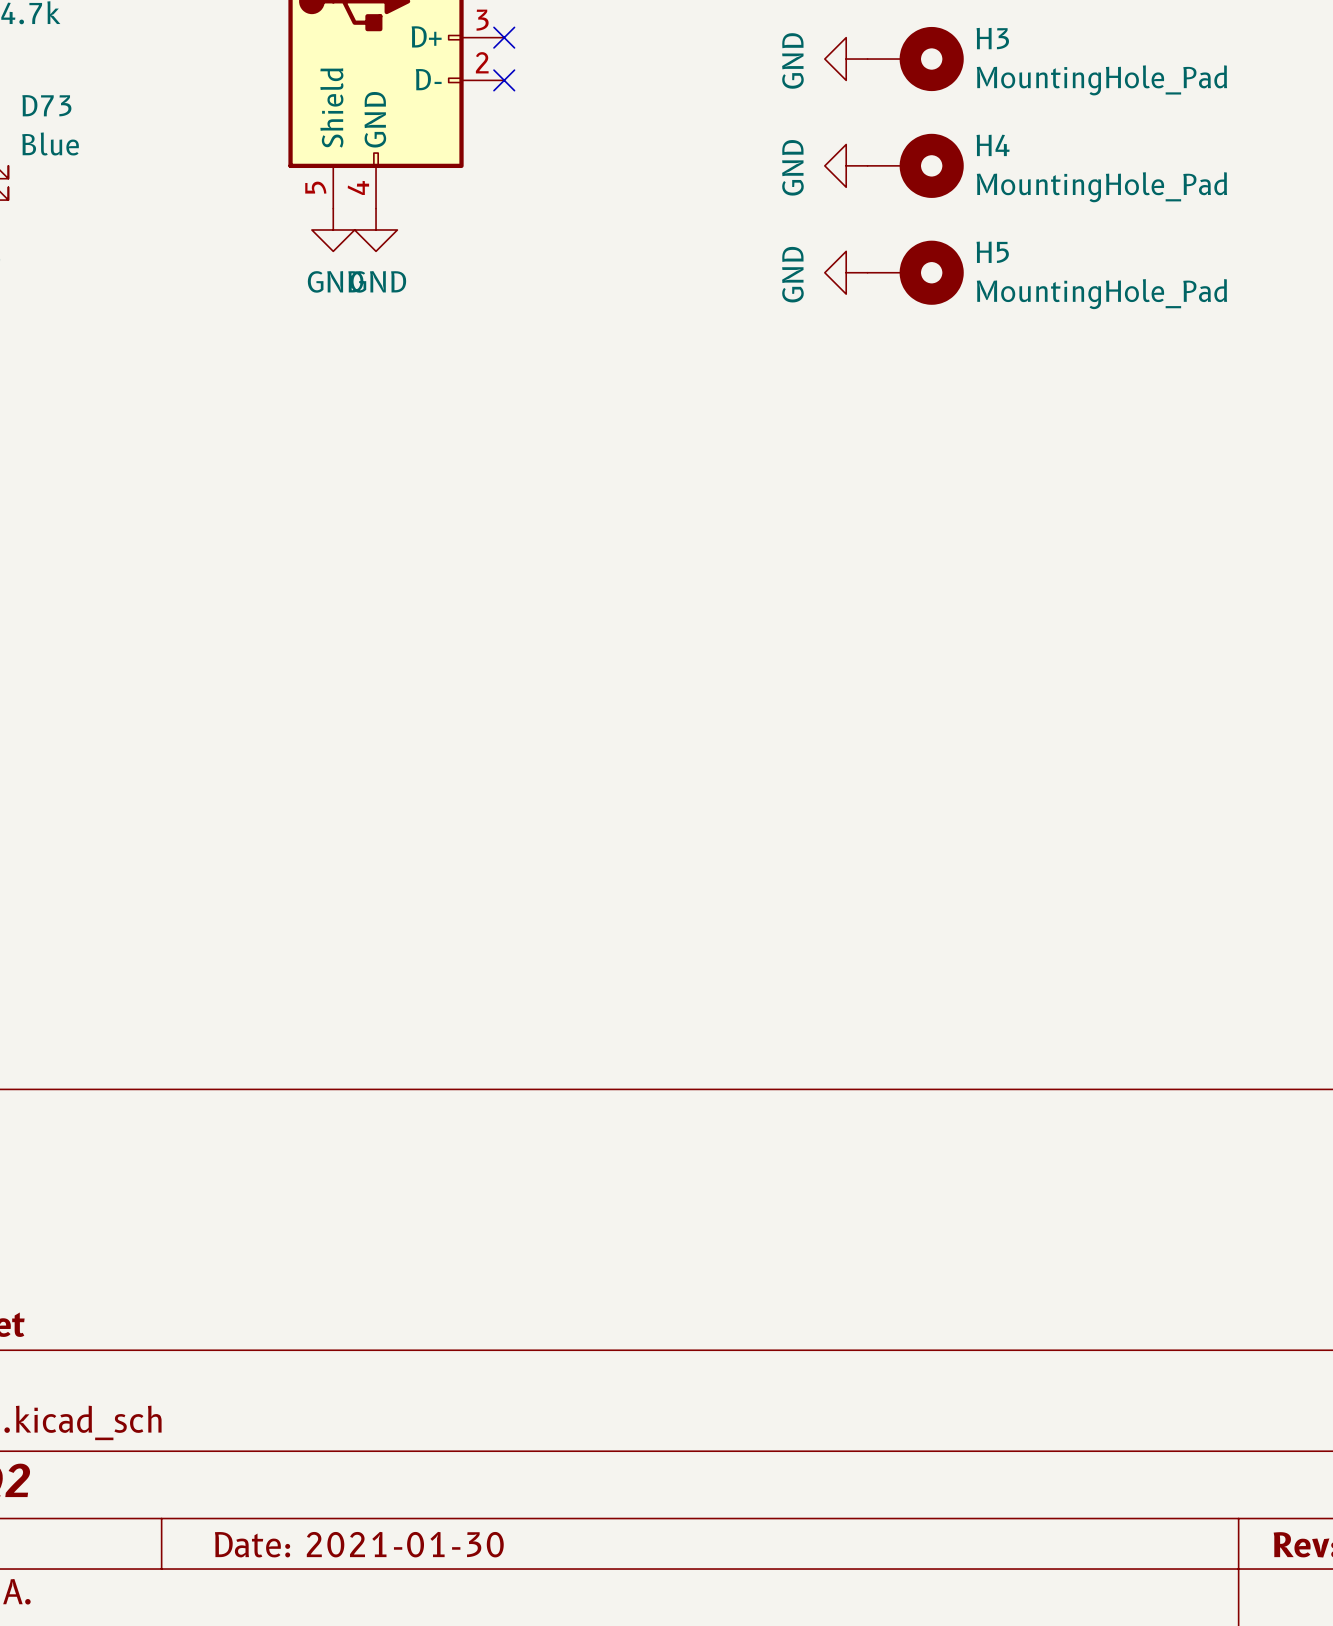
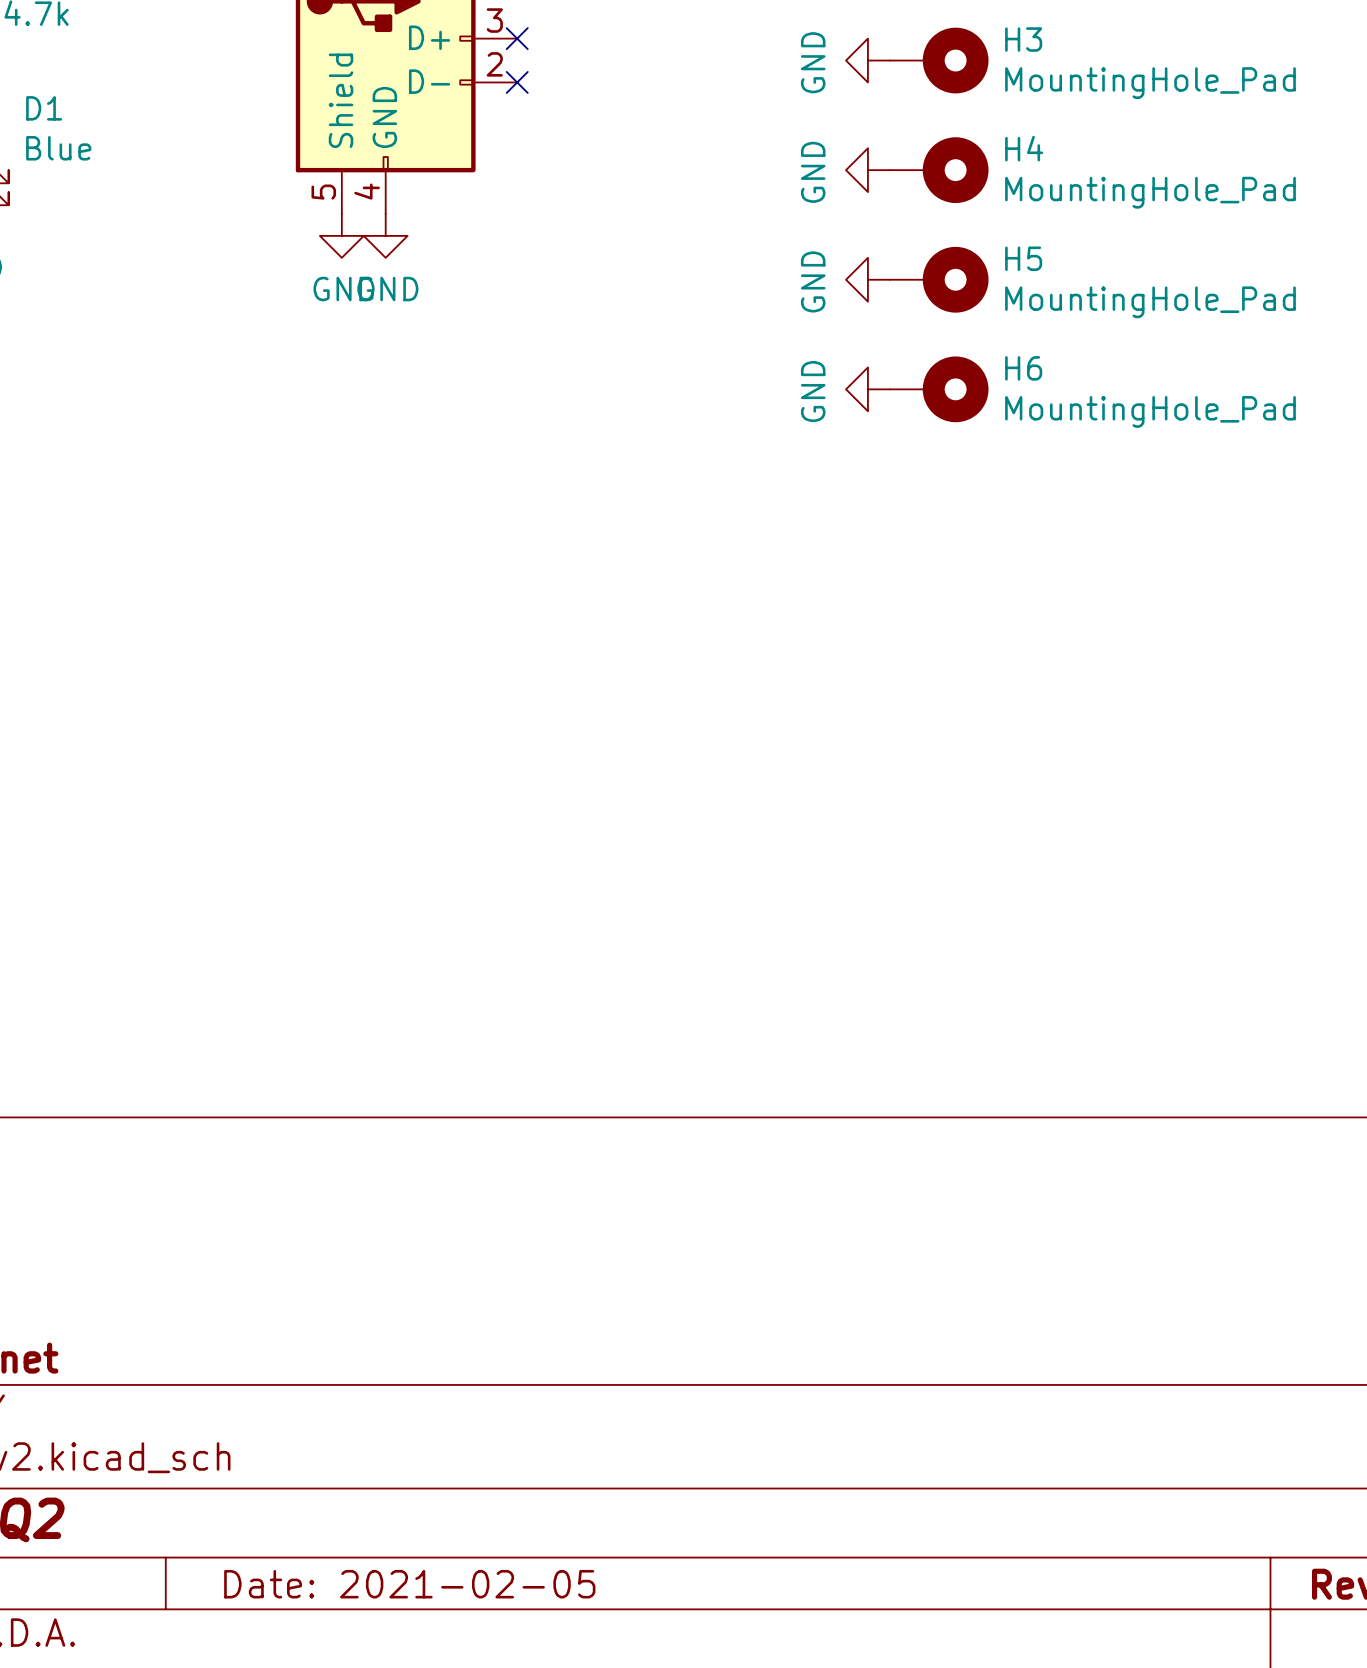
D73 name: D73 (46, 105) -> D1 (44, 108)
power symbol: none -> GND (867, 389)
H6: none -> MountingHole_Pad (939, 389)
title block: Date: 2021-01-30 (359, 1544) -> Date: 2021-02-05 (409, 1584)

